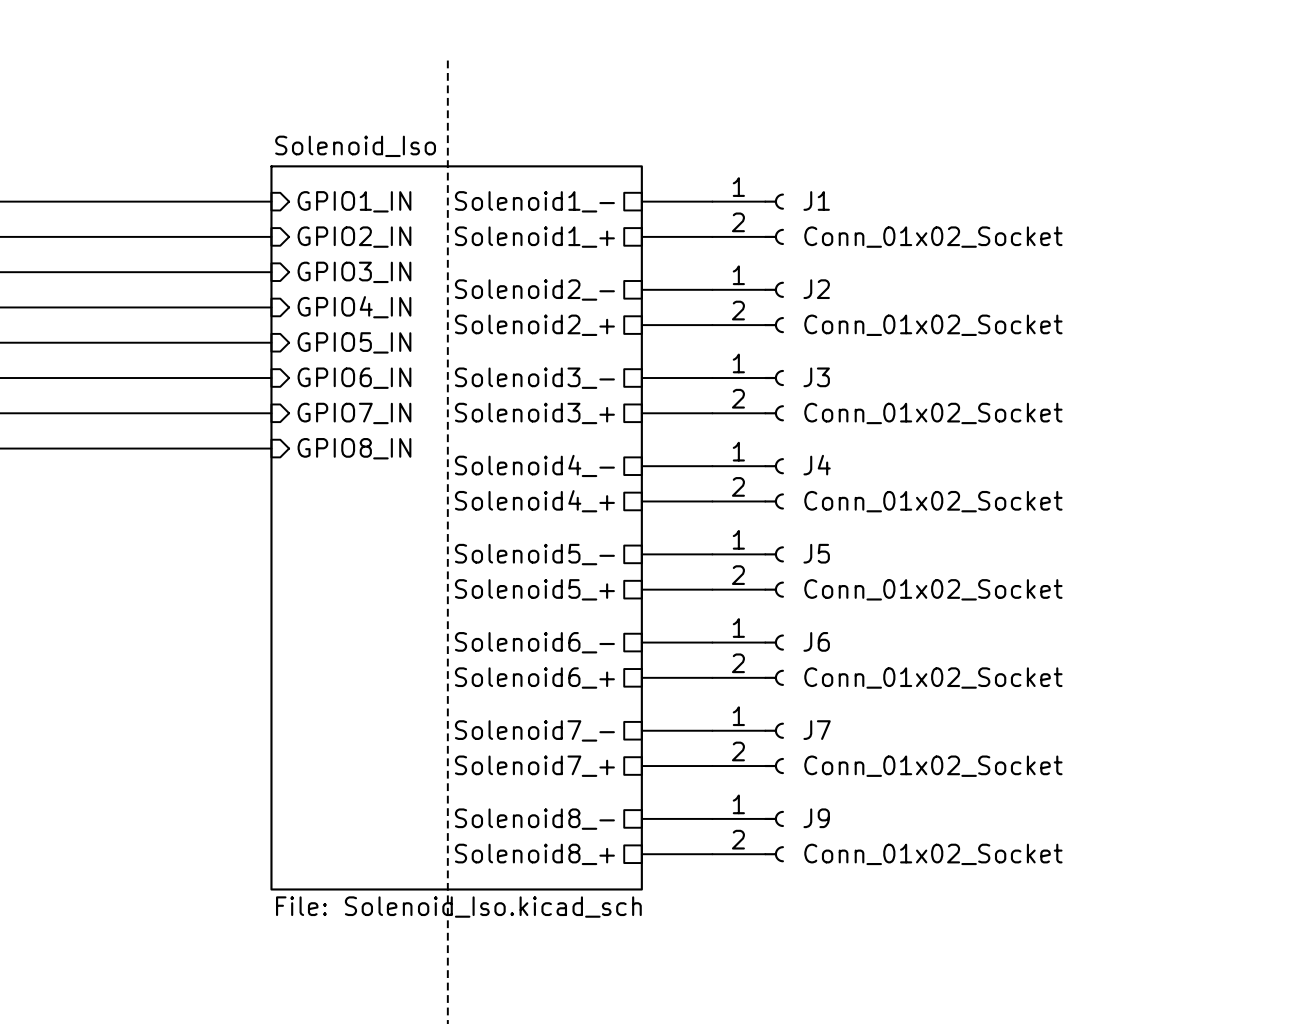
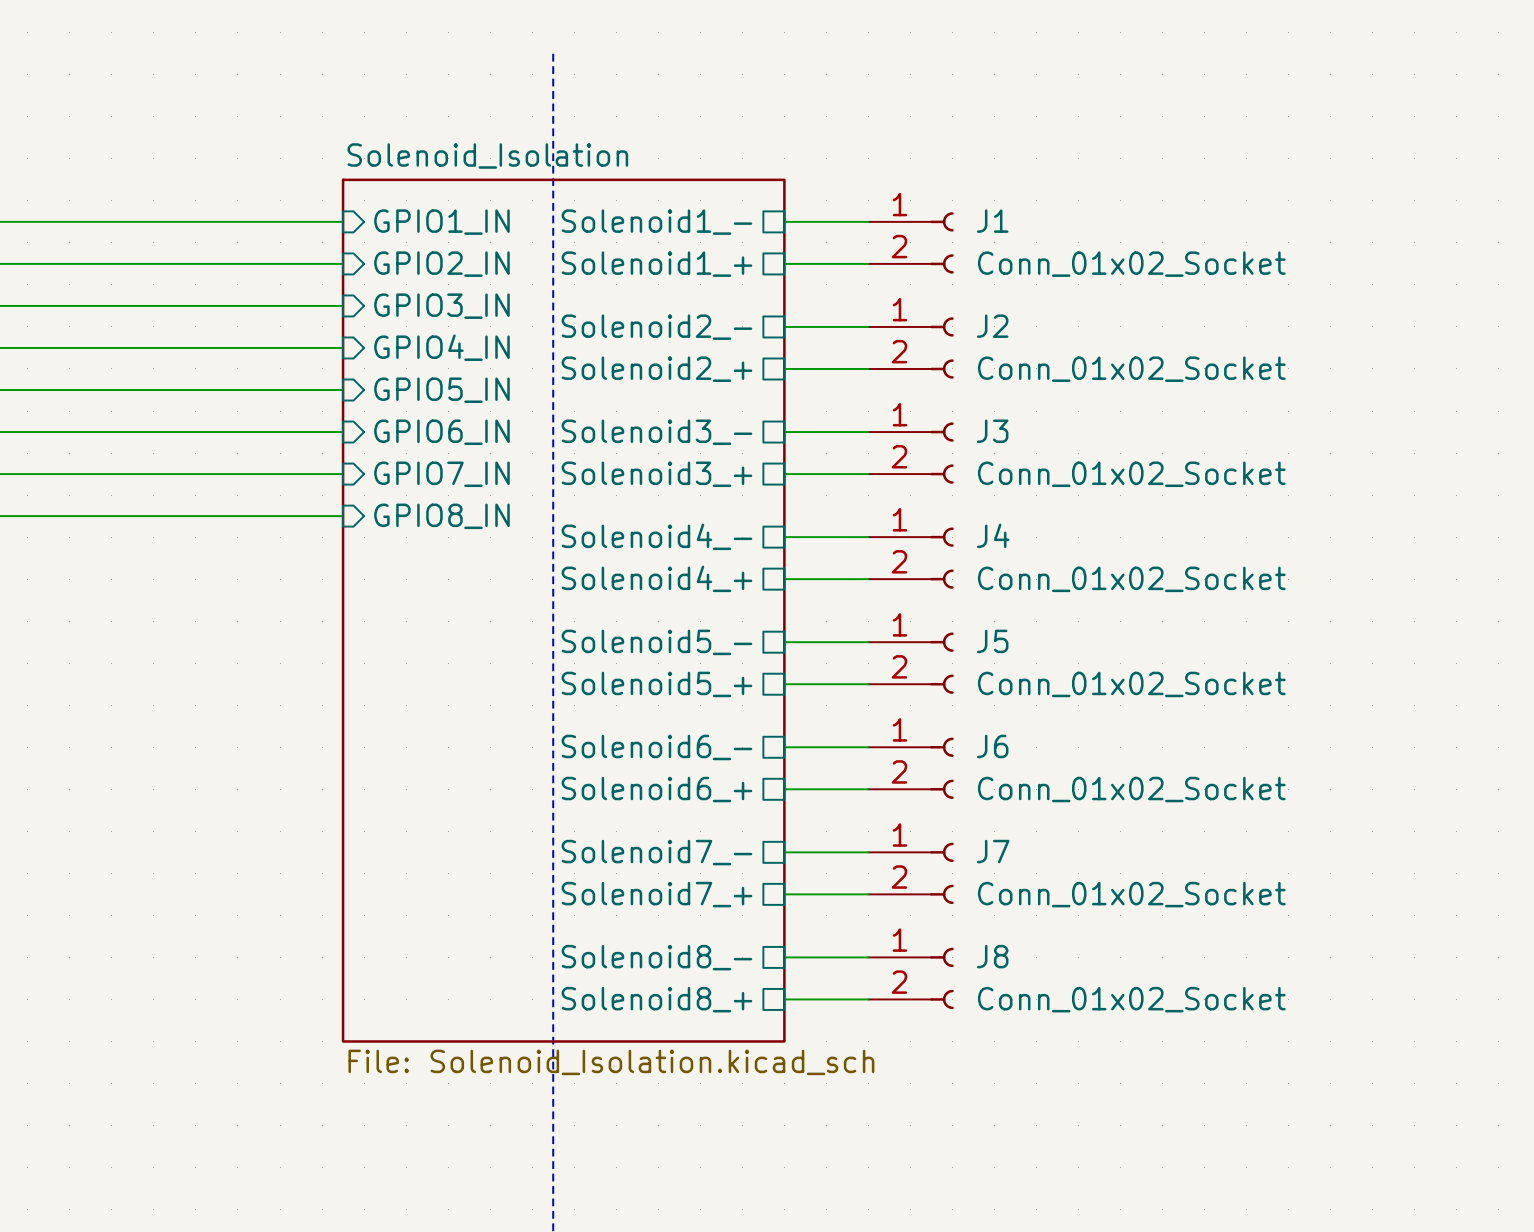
sheet Solenoid_Iso name: Solenoid_Iso (355, 146) -> Solenoid_Isolation (487, 156)
J9 name: J9 (816, 818) -> J8 (992, 956)
sheet Solenoid_Iso value: File: Solenoid_Iso.kicad_sch (458, 907) -> File: Solenoid_Isolation.kicad_sch (611, 1062)

